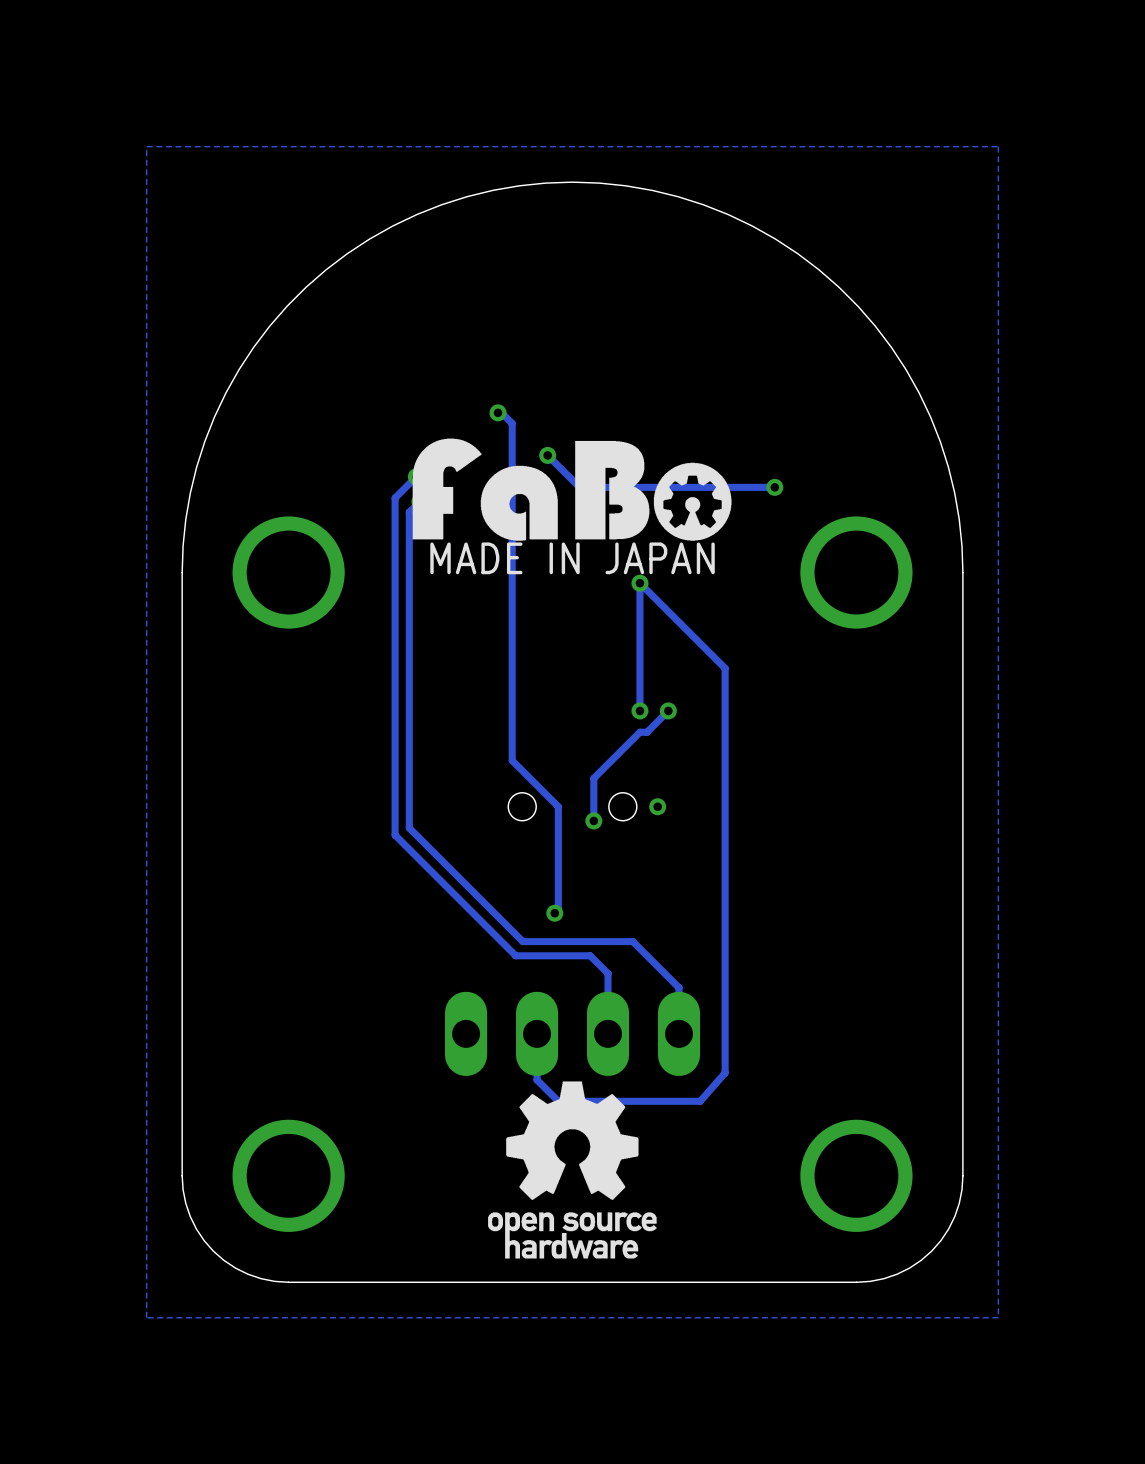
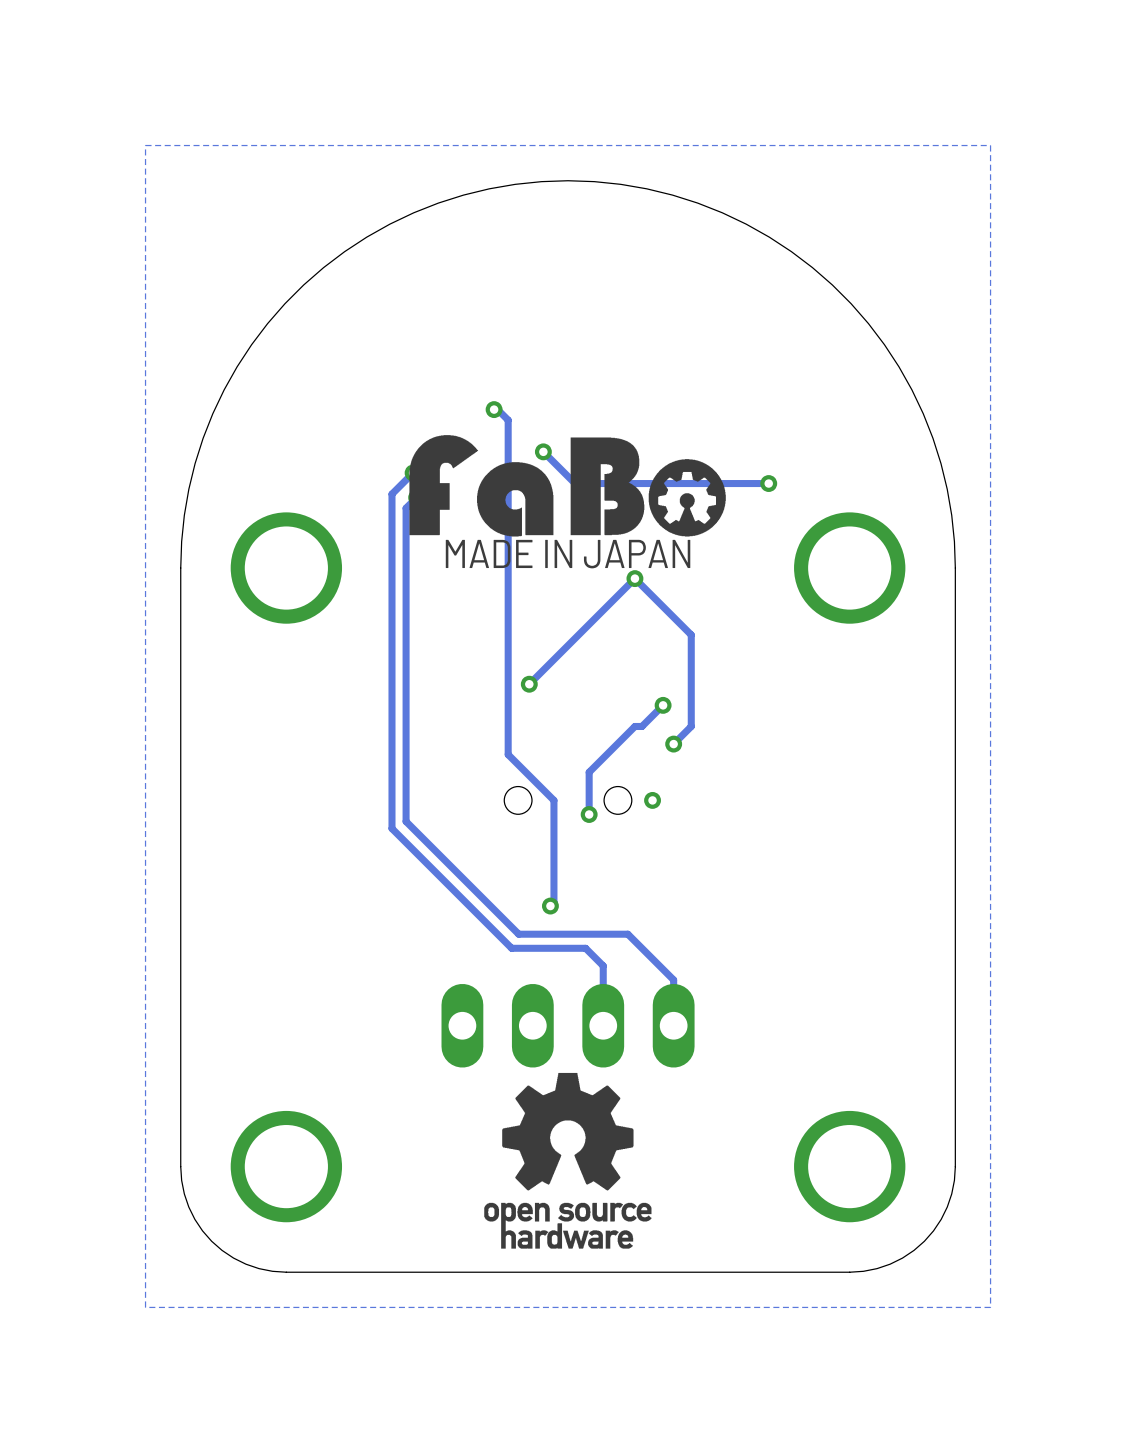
track: (639, 583) (639, 710) -> (634, 578) (529, 684)
track: (696, 639) (725, 668) (725, 1072) (700, 1101) (558, 1101) (537, 1080) (537, 1033) -> (691, 634) (691, 726) (673, 744)
via: none -> (529, 684)
via: (639, 710) -> none
via: none -> (673, 744)

